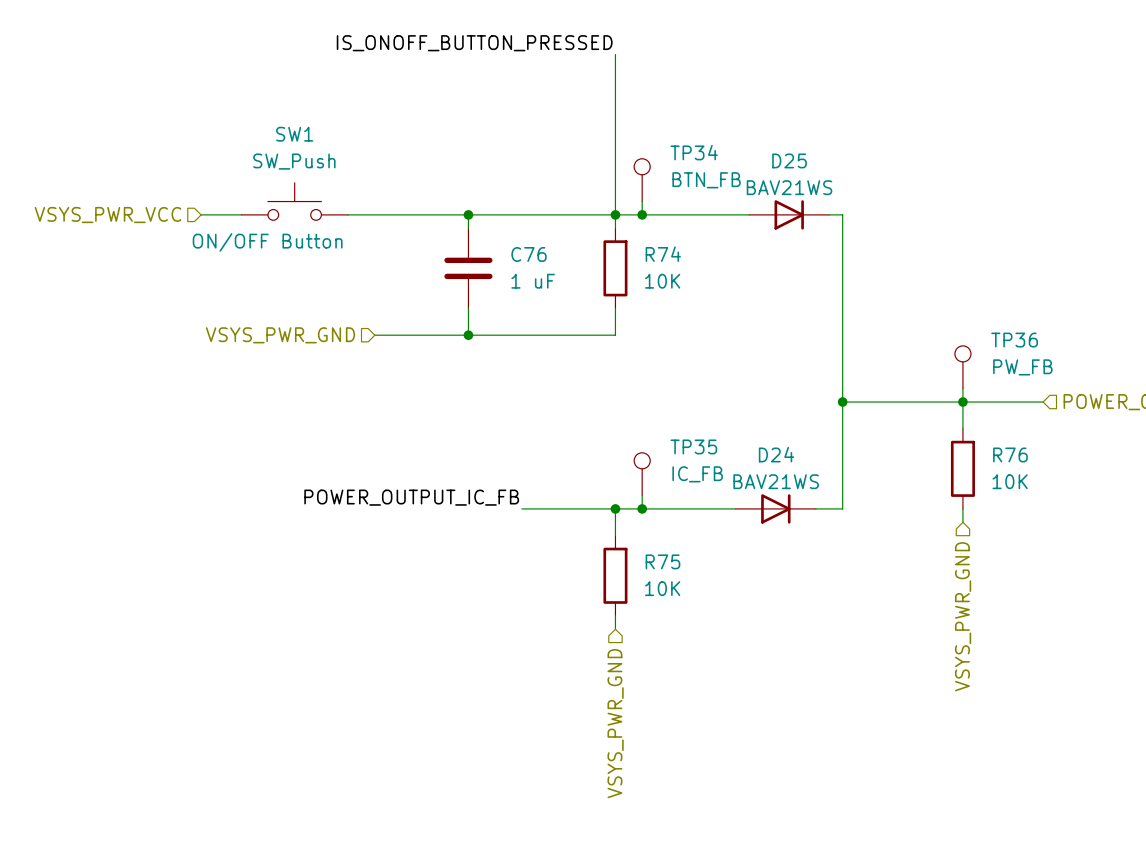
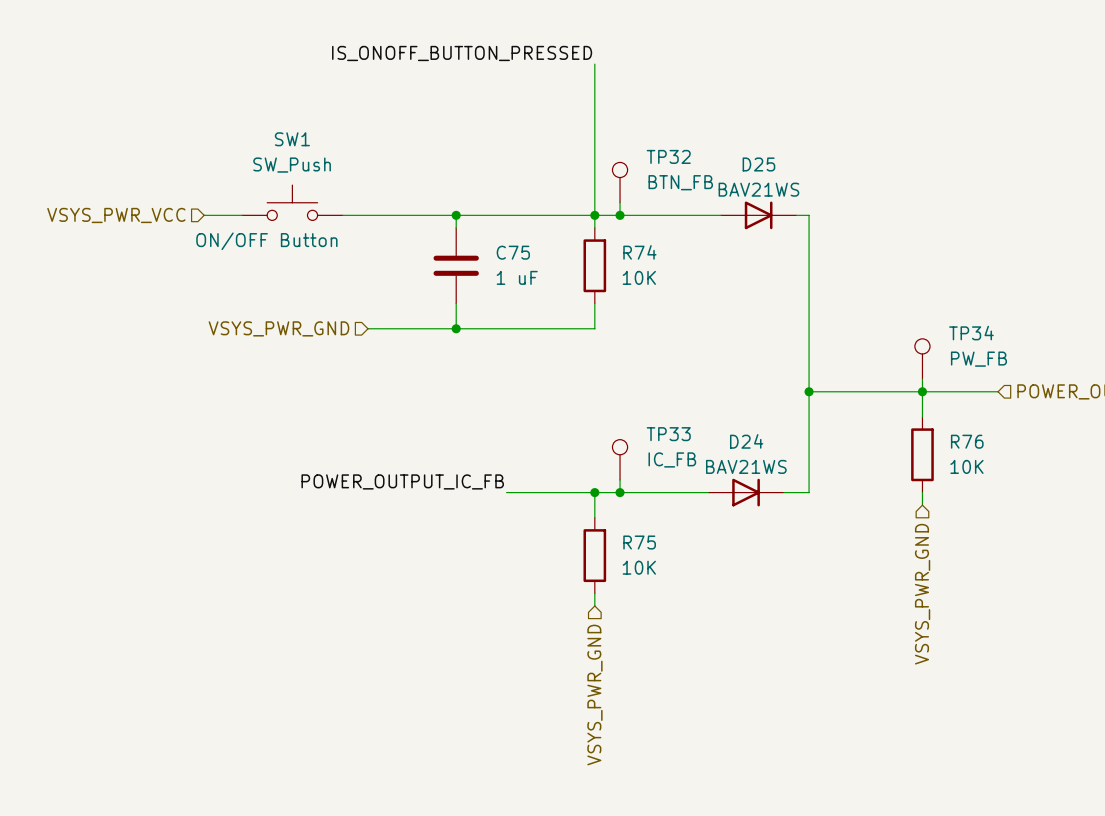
TP34 name: TP34 (694, 152) -> TP32 (668, 156)
C76 name: C76 (528, 254) -> C75 (513, 252)
TP36 name: TP36 (1014, 340) -> TP34 (971, 333)
TP35 name: TP35 (693, 446) -> TP33 (668, 434)

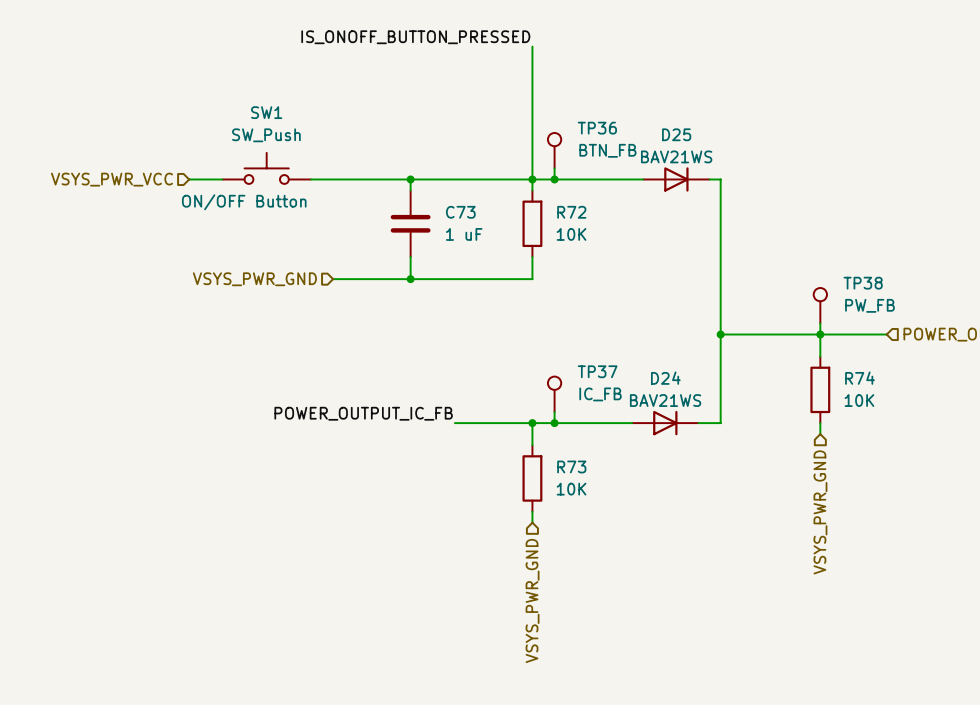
TP32 name: TP32 (668, 156) -> TP36 (597, 128)
C75 name: C75 (513, 252) -> C73 (460, 212)
R74 name: R74 (639, 252) -> R72 (571, 212)
TP34 name: TP34 (971, 333) -> TP38 (863, 283)
TP33 name: TP33 (668, 434) -> TP37 (597, 371)
R76 name: R76 (967, 441) -> R74 (859, 378)
R75 name: R75 (639, 542) -> R73 (571, 466)

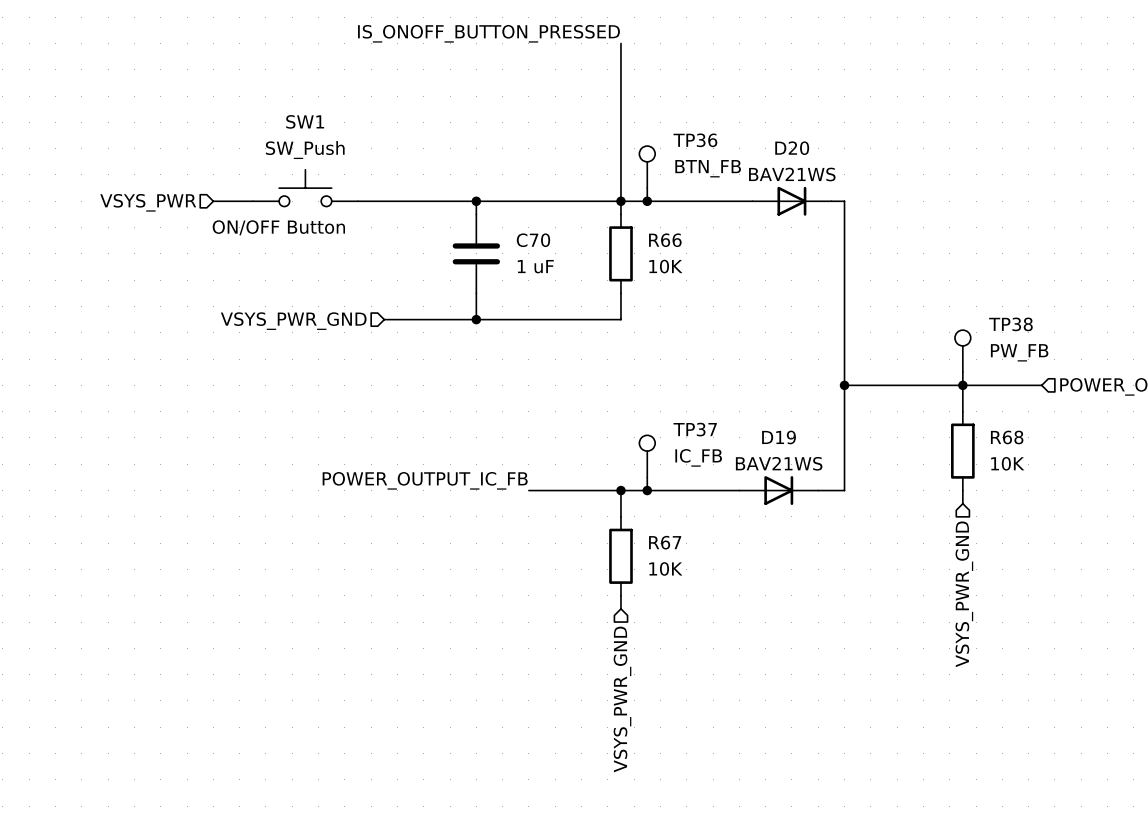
D25 name: D25 (676, 134) -> D20 (792, 148)
hierarchical label: VSYS_PWR_VCC (112, 179) -> VSYS_PWR (148, 202)
C73 name: C73 (460, 212) -> C70 (533, 240)
R72 name: R72 (571, 212) -> R66 (665, 240)
D24 name: D24 (665, 378) -> D19 (779, 437)
R74 name: R74 (859, 378) -> R68 (1007, 437)
R73 name: R73 (571, 466) -> R67 (665, 542)

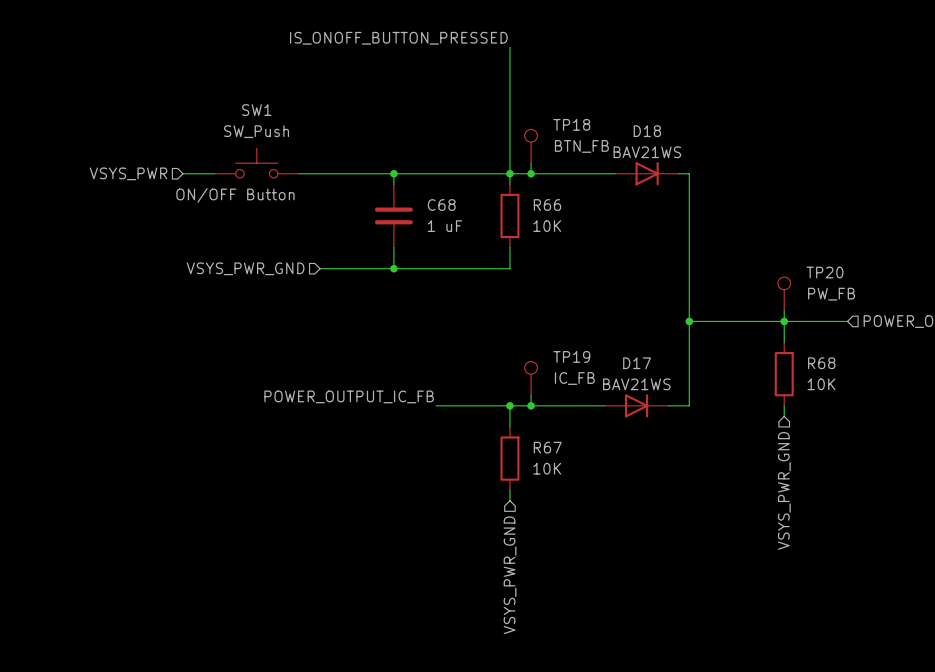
TP36 name: TP36 (695, 140) -> TP18 (571, 124)
D20 name: D20 (792, 148) -> D18 (647, 131)
C70 name: C70 (533, 240) -> C68 (441, 205)
TP38 name: TP38 (1010, 324) -> TP20 (825, 272)
TP37 name: TP37 (695, 429) -> TP19 (571, 356)
D19 name: D19 (779, 437) -> D17 (637, 363)

